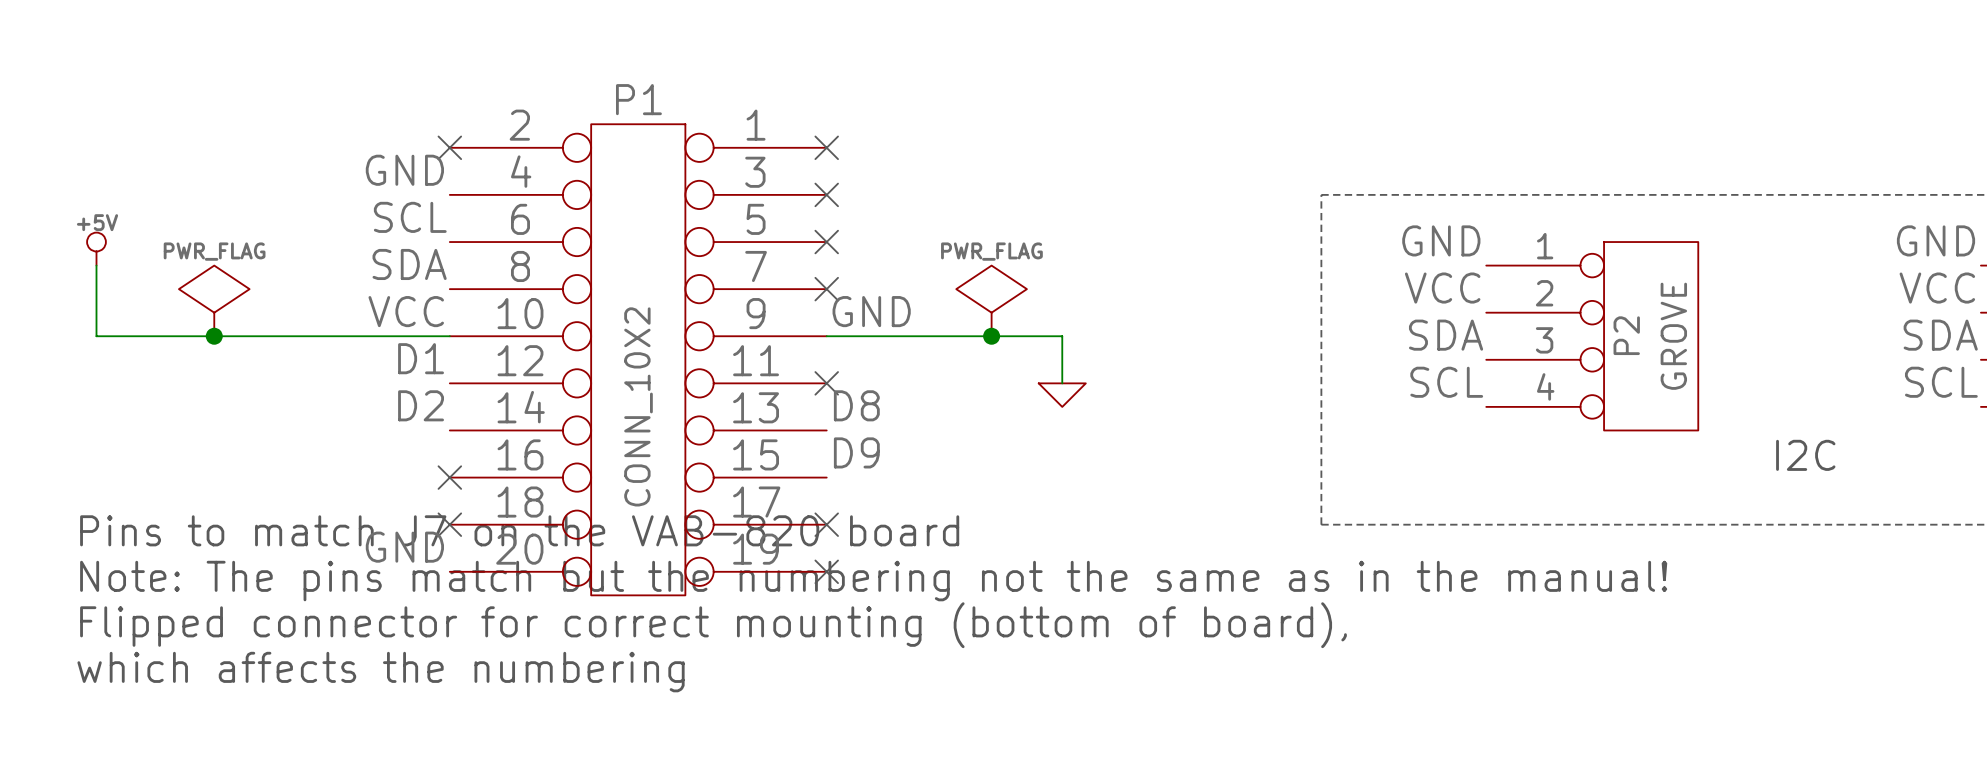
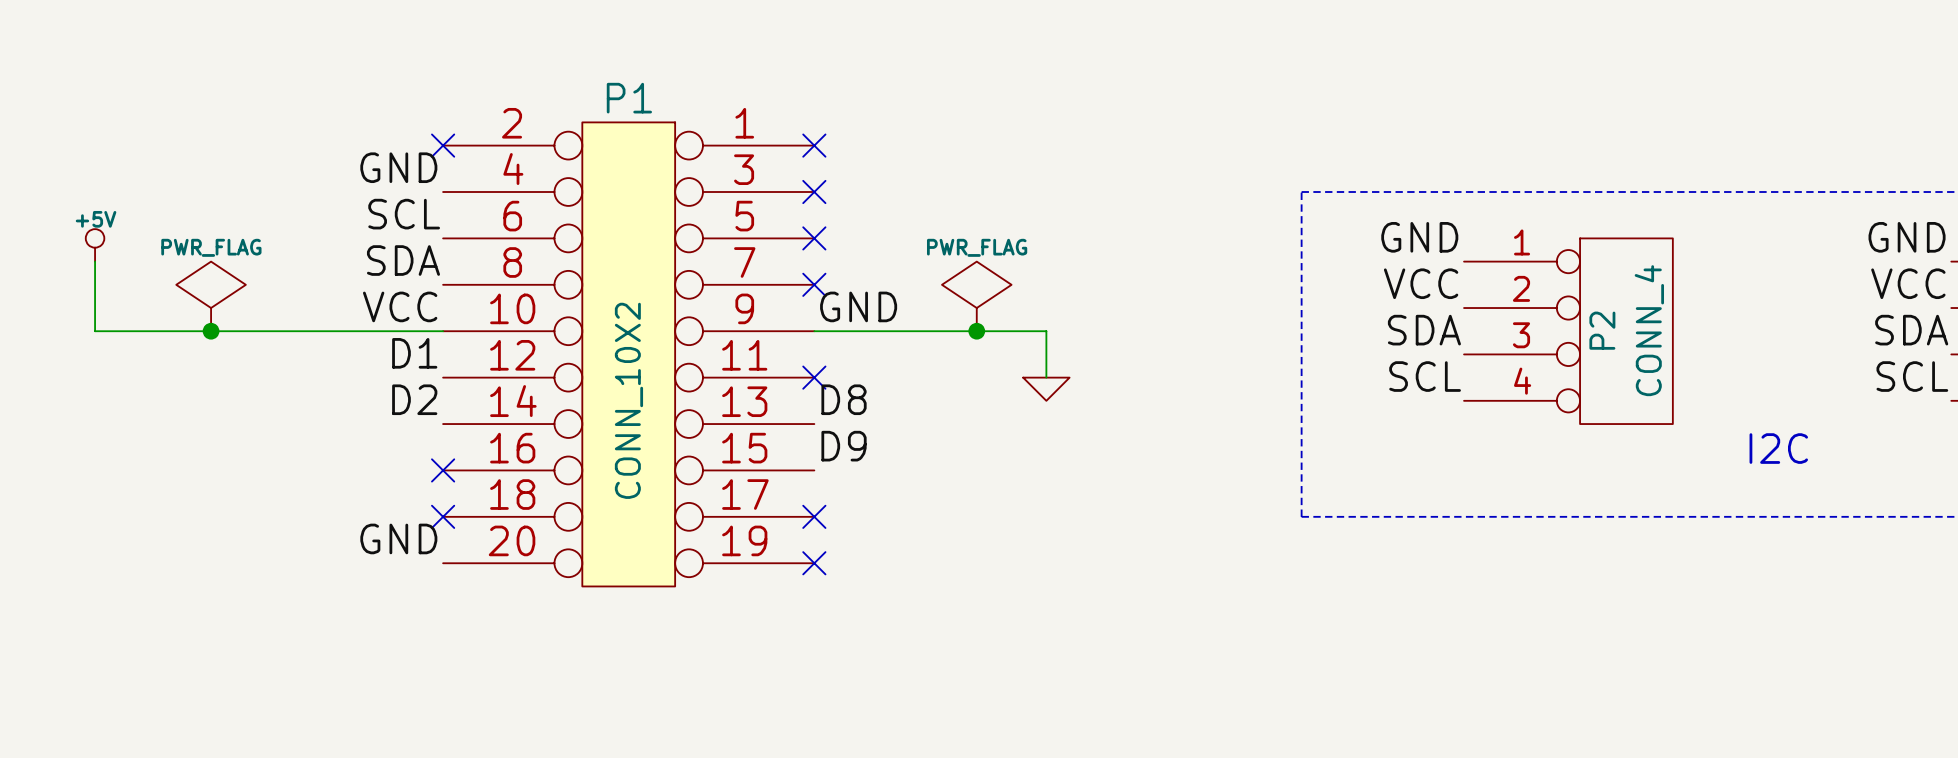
P2 value: GROVE (1673, 336) -> CONN_4 (1649, 330)
text: Pins to match J7 on the VAB-820 board (519, 530) -> none
text: Note: The pins match but the numbering not the same as in the manual! (873, 581) -> none
text: Flipped connector for correct mounting (bottom of board), (713, 625) -> none
text: which affects the numbering (381, 672) -> none

